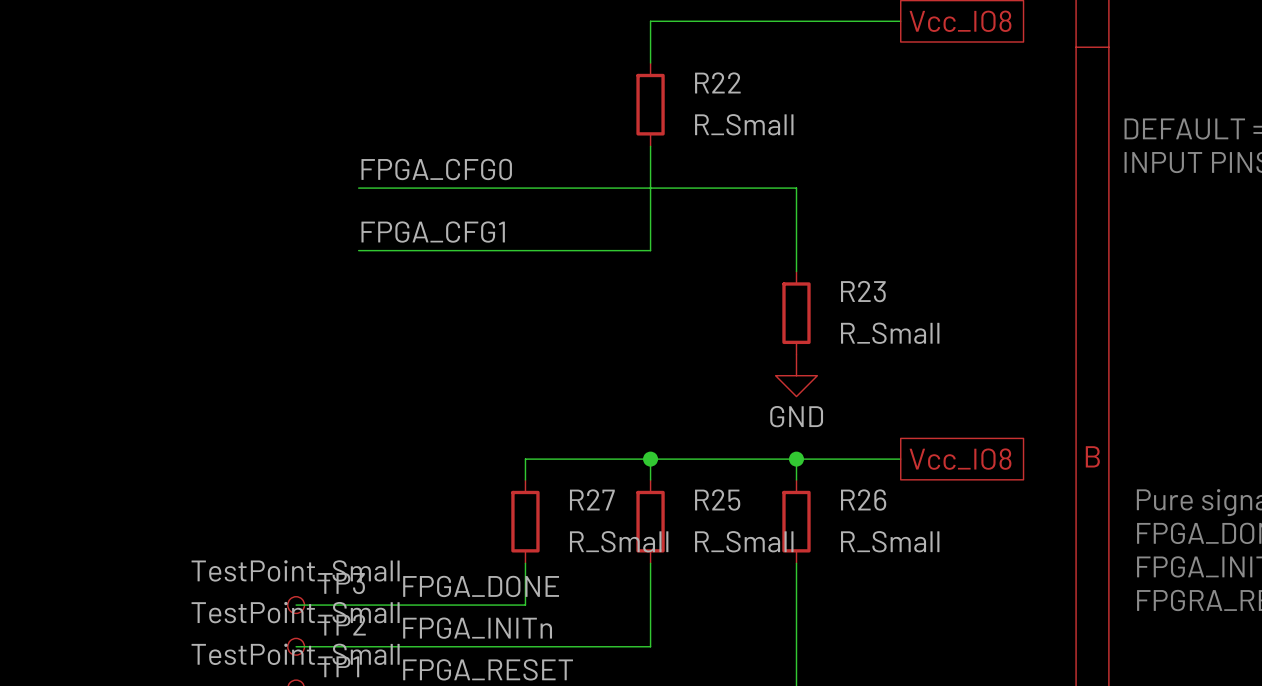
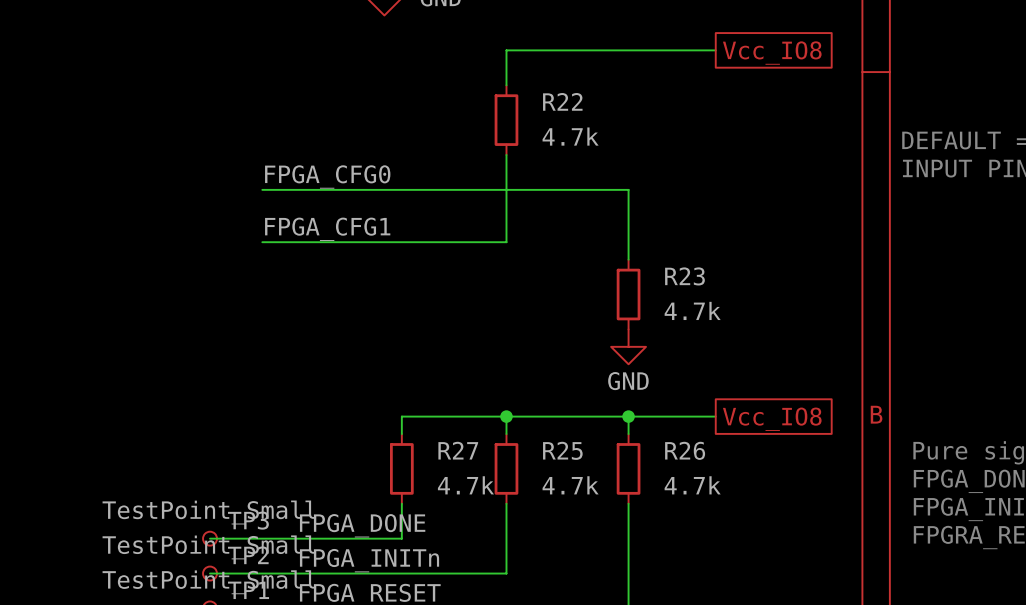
R22 value: R_Small (744, 124) -> 4.7k (570, 136)
R23 value: R_Small (890, 333) -> 4.7k (692, 310)
R27 value: R_Small (619, 541) -> 4.7k (465, 485)
R25 value: R_Small (744, 541) -> 4.7k (570, 485)
R26 value: R_Small (890, 541) -> 4.7k (692, 485)

